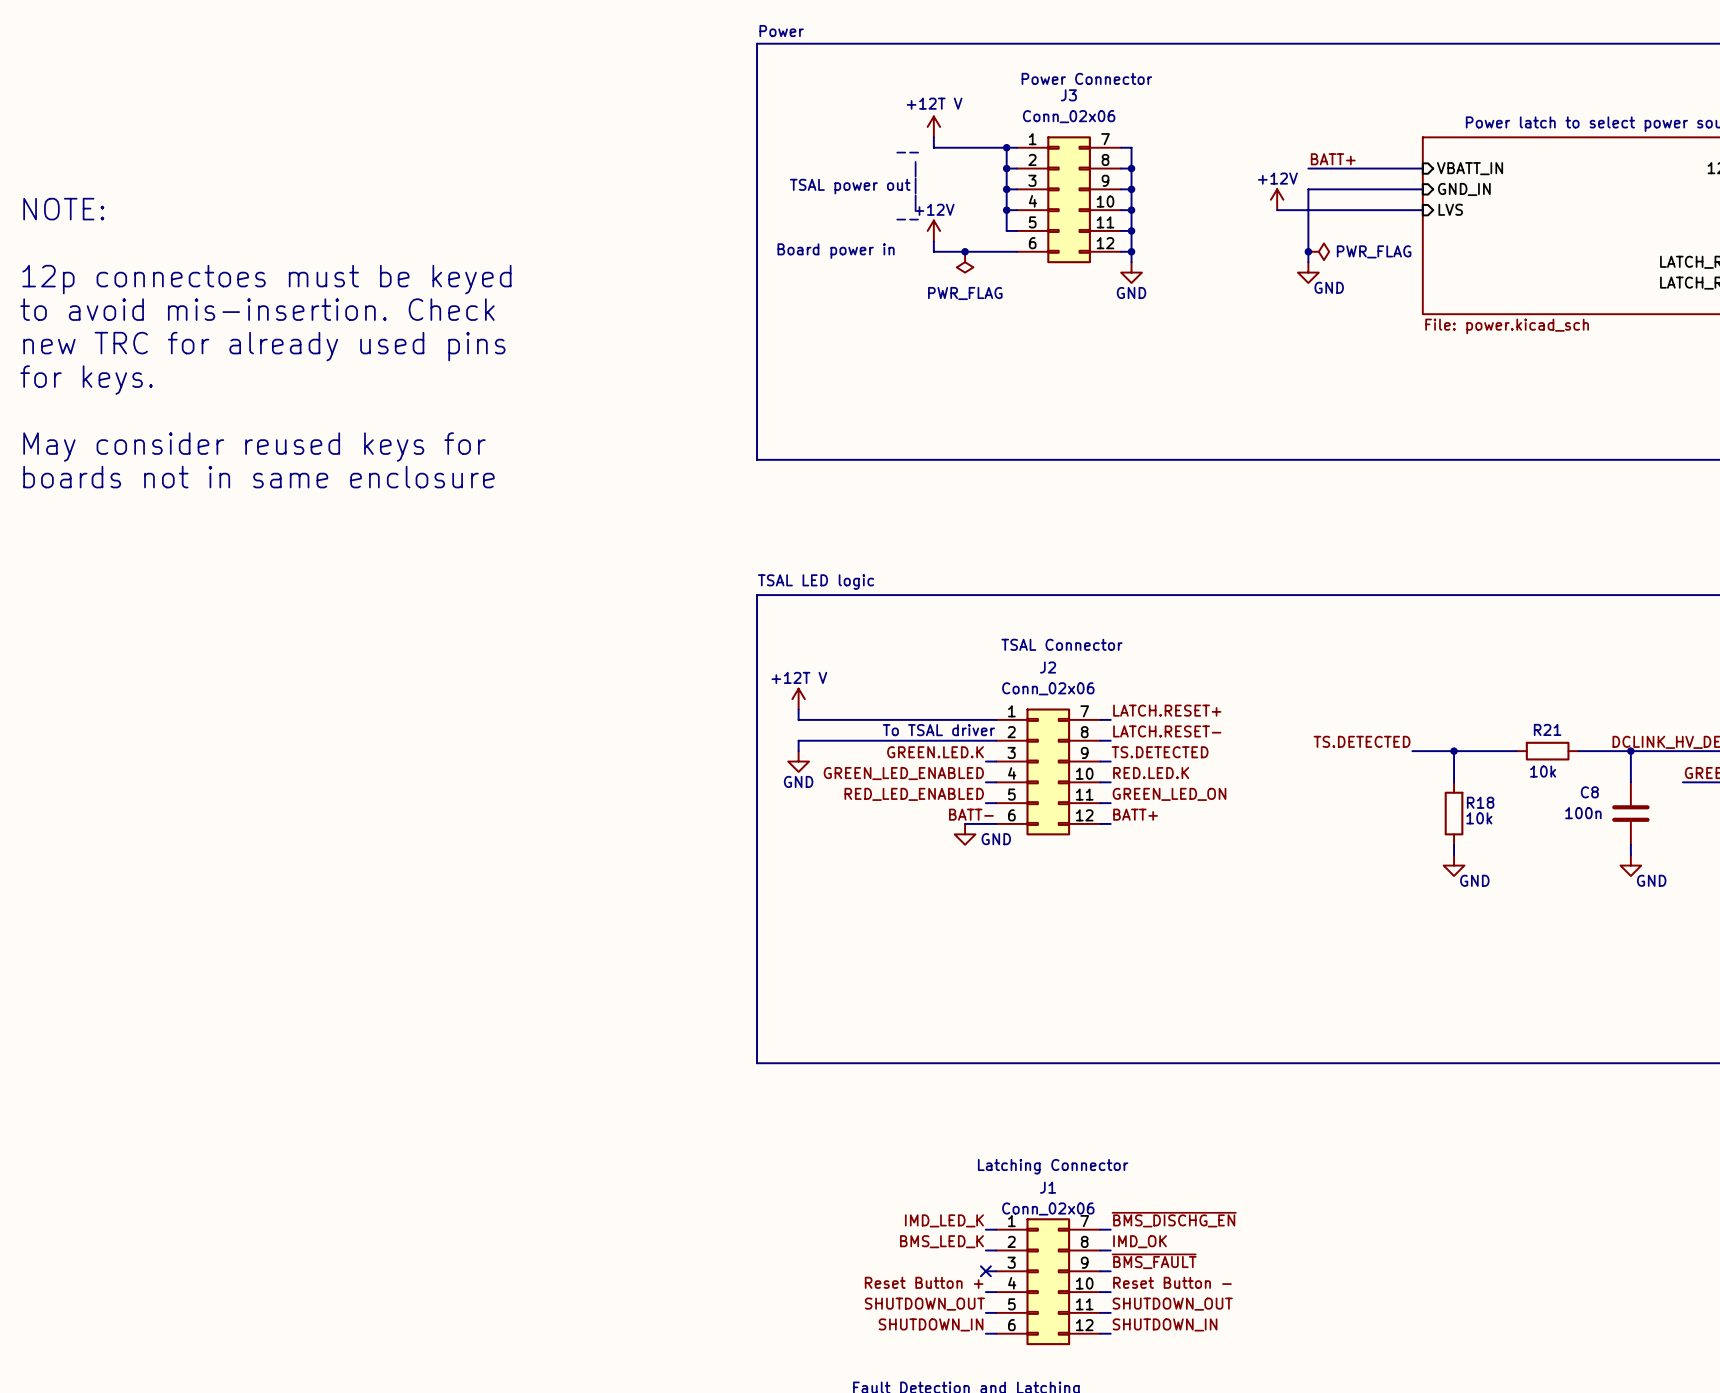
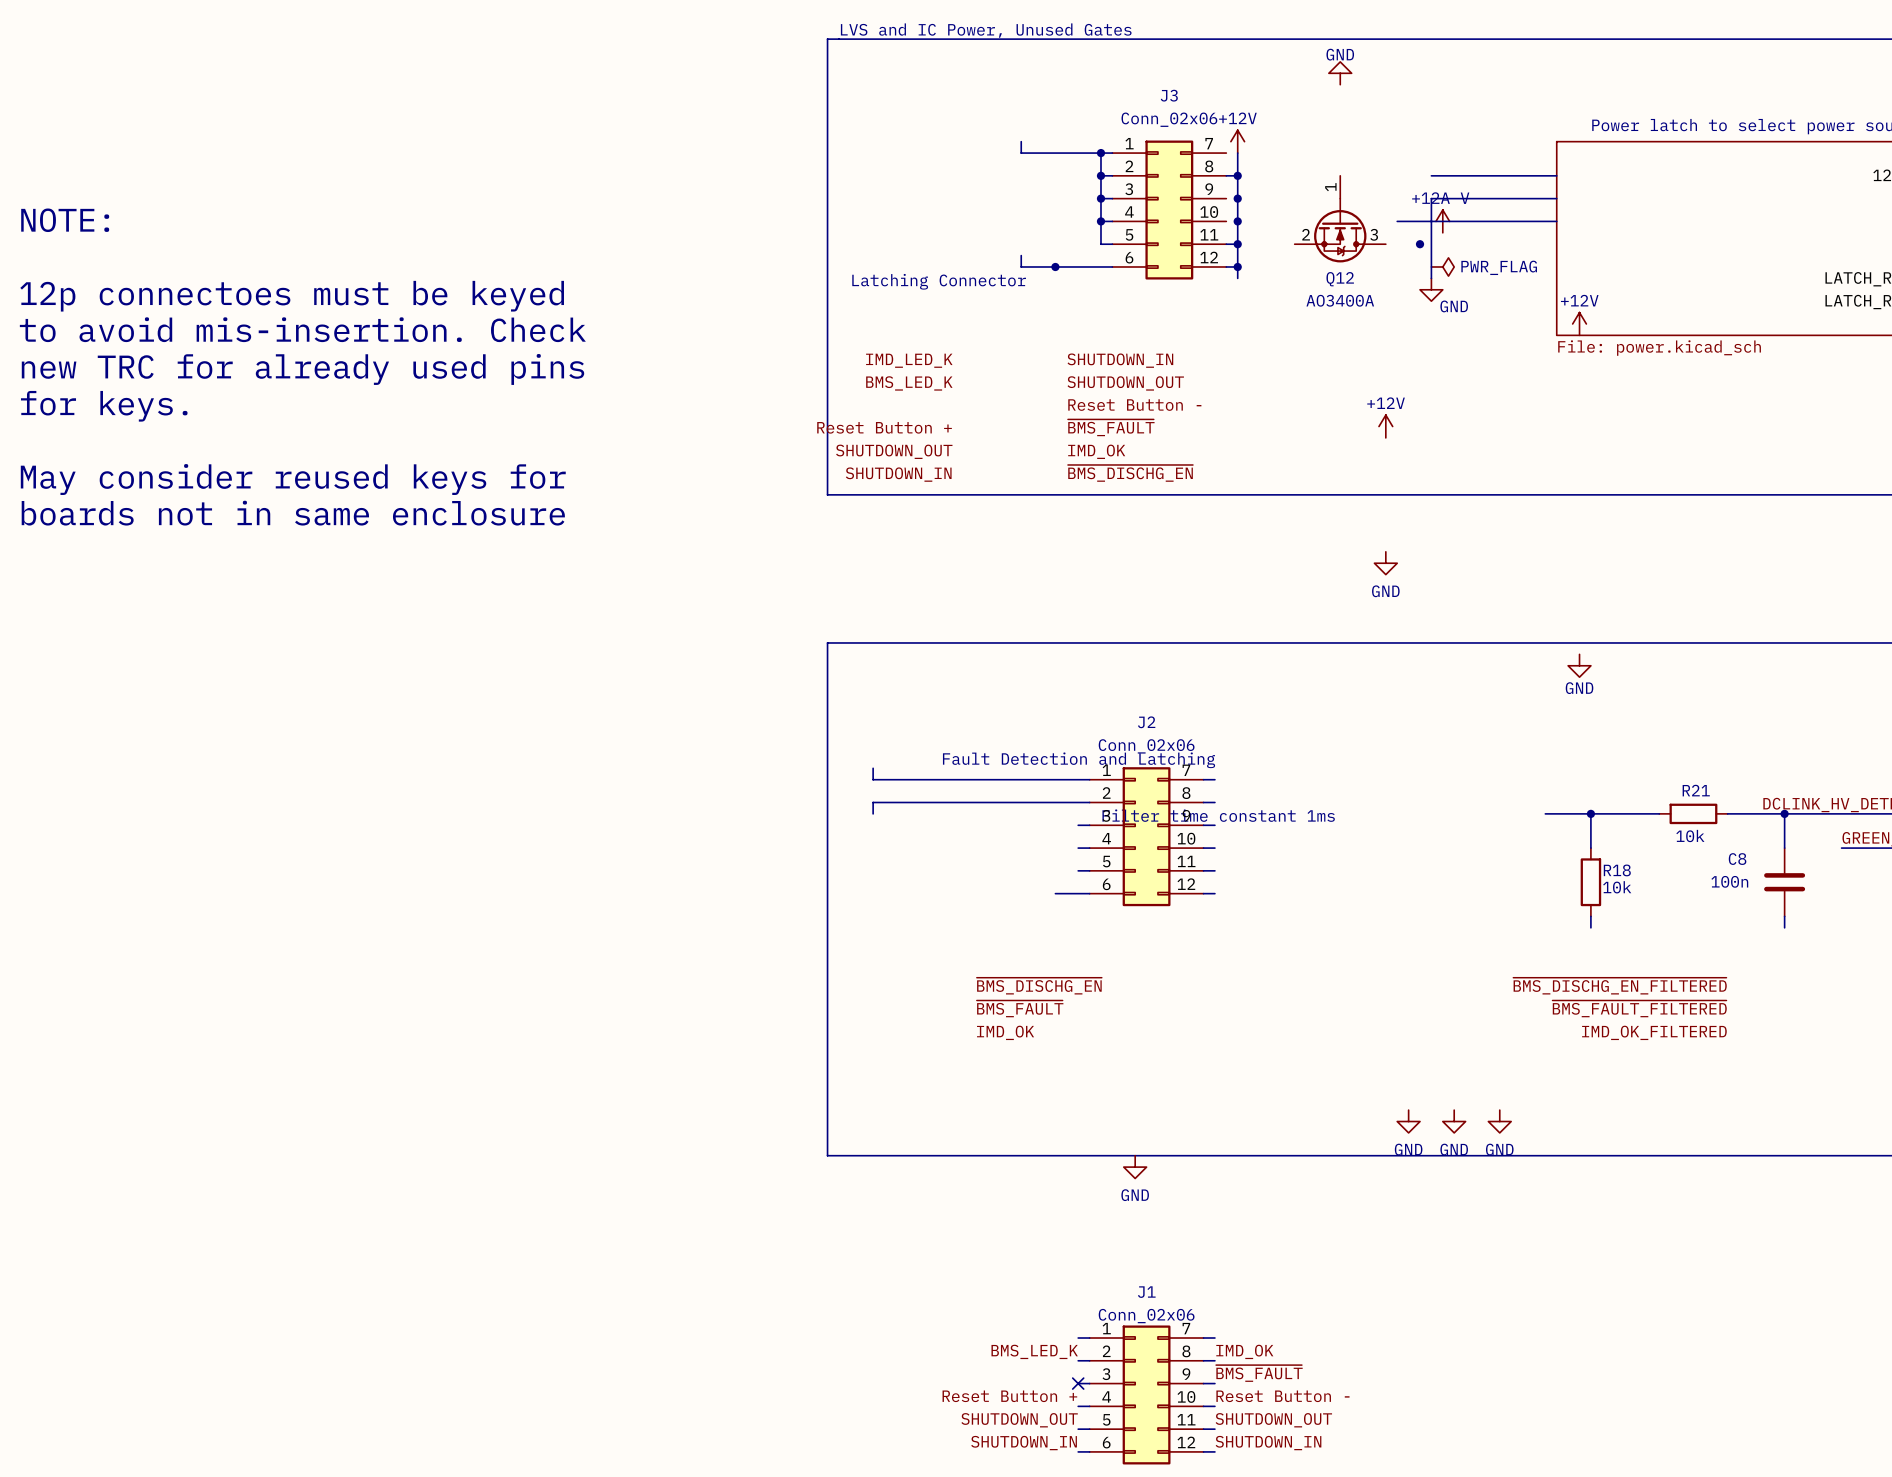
text: Power (781, 31) -> none
text: none -> LVS and IC Power, Unused Gates (986, 30)
power symbol: none -> GND (1340, 73)
text: Power Connector (1086, 78) -> none
power symbol: +12T V (933, 126) -> none
power symbol: none -> +12V (1237, 141)
wire: (1121, 147) (1131, 147) -> none
text: -- (907, 152) -> none
label: BATT+ (1333, 159) -> none
sheet pin: VBATT_IN (1470, 168) -> none
text: | (915, 169) -> none
text: TSAL power out| (853, 186) -> none
wire: (1121, 189) (1131, 189) -> none
sheet pin: GND_IN (1464, 189) -> none
power symbol: +12V (1277, 199) -> none
text: | (915, 202) -> none
Q12: none -> AO3400A (1340, 219)
sheet pin: LVS (1450, 209) -> none
wire: (1121, 210) (1131, 210) -> none
power symbol: none -> +12A V (1442, 221)
text: -- (907, 219) -> none
power symbol: +12V (933, 230) -> none
text: Board power in (836, 251) -> none
junction position: (1308, 251) -> (1420, 244)
power symbol: PWR_FLAG (965, 262) -> none
text: none -> Latching Connector (939, 281)
power symbol: GND (1131, 272) -> none
power symbol: none -> +12V (1579, 323)
label: none -> IMD_LED_K (909, 360)
label: none -> SHUTDOWN_IN (1120, 360)
label: none -> BMS_LED_K (909, 383)
label: none -> SHUTDOWN_OUT (1125, 383)
label: none -> Reset Button - (1134, 405)
label: none -> ~{BMS_FAULT} (1111, 427)
power symbol: none -> +12V (1385, 426)
label: none -> Reset Button + (884, 427)
label: none -> SHUTDOWN_OUT (894, 451)
label: none -> IMD_OK (1096, 451)
label: none -> ~{BMS_DISCHG_EN} (1130, 473)
label: none -> SHUTDOWN_IN (898, 474)
power symbol: none -> GND (1385, 563)
text: TSAL LED logic (816, 582) -> none
power symbol: none -> GND (1579, 665)
text: TSAL Connector (1061, 644) -> none
power symbol: +12T V (798, 699) -> none
text: none -> Fault Detection and Latching (1079, 760)
label: LATCH.RESET+ (1167, 710) -> none
text: To TSAL driver (938, 730) -> none
label: LATCH.RESET- (1167, 731) -> none
label: TS.DETECTED (1362, 741) -> none
label: GREEN.LED.K (935, 752) -> none
label: TS.DETECTED (1160, 752) -> none
text: none -> Filter time constant 1ms (1218, 815)
power symbol: GND (798, 761) -> none
label: GREEN_LED_ENABLED (903, 773) -> none
label: RED.LED.K (1151, 773) -> none
label: RED_LED_ENABLED (914, 794) -> none
label: GREEN_LED_ON (1169, 794) -> none
label: BATT- (971, 814) -> none
label: BATT+ (1135, 814) -> none
power symbol: GND (965, 834) -> none
power symbol: GND (1454, 865) -> none
power symbol: GND (1630, 865) -> none
label: none -> ~{BMS_DISCHG_EN} (1039, 986)
label: none -> ~{BMS_DISCHG_EN_FILTERED} (1620, 986)
label: none -> ~{BMS_FAULT} (1020, 1008)
label: none -> ~{BMS_FAULT_FILTERED} (1639, 1008)
label: none -> IMD_OK (1005, 1032)
label: none -> IMD_OK_FILTERED (1654, 1032)
power symbol: none -> GND (1408, 1121)
power symbol: none -> GND (1454, 1121)
power symbol: none -> GND (1499, 1121)
power symbol: none -> GND (1135, 1167)
text: Latching Connector (1053, 1166) -> none
label: ~{BMS_DISCHG_EN} (1174, 1219) -> none
label: IMD_LED_K (944, 1220) -> none

